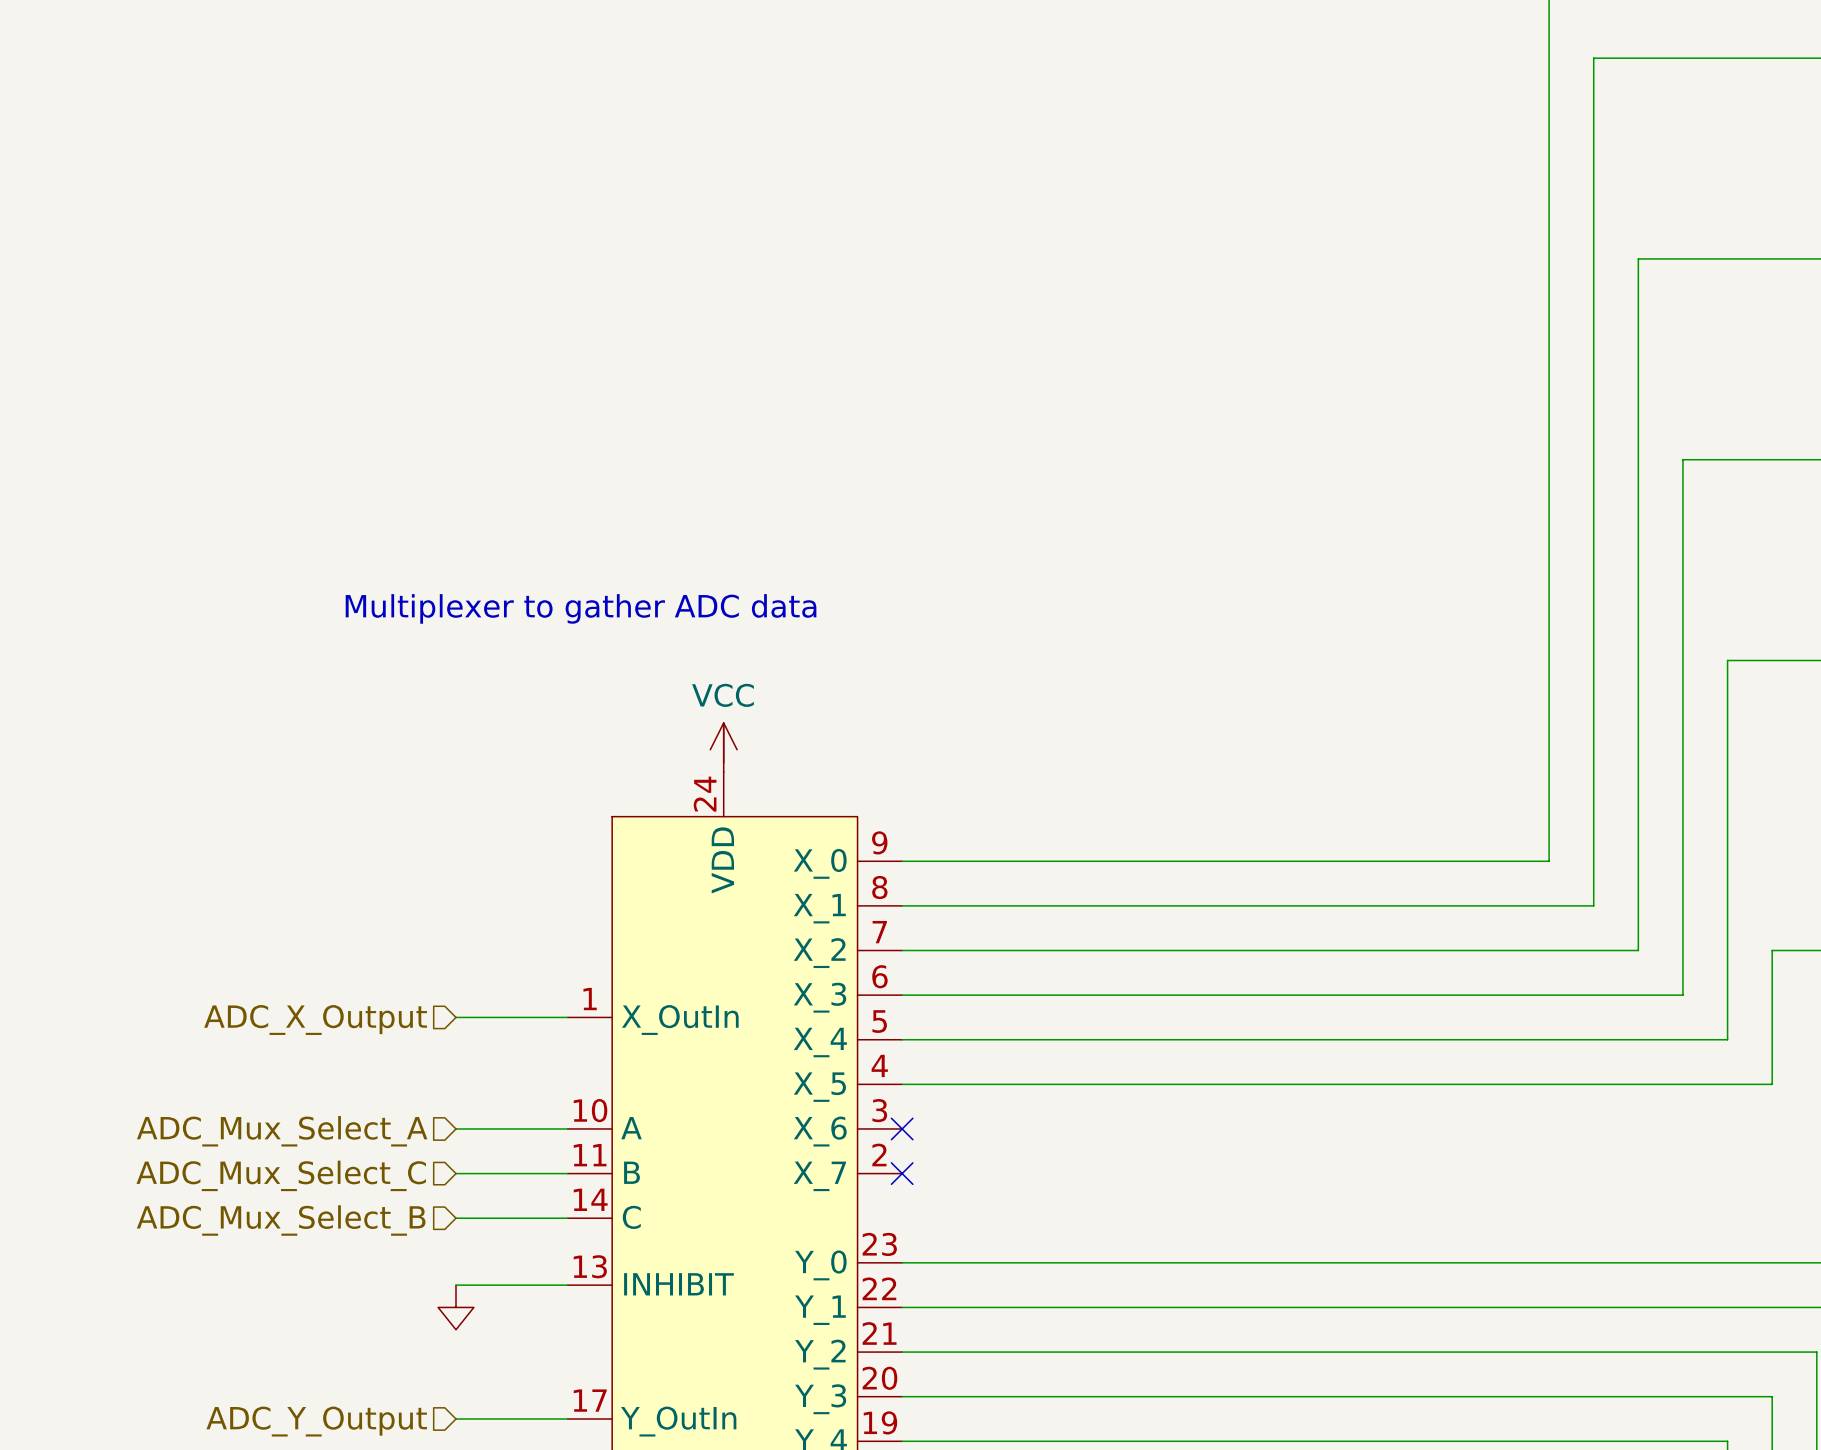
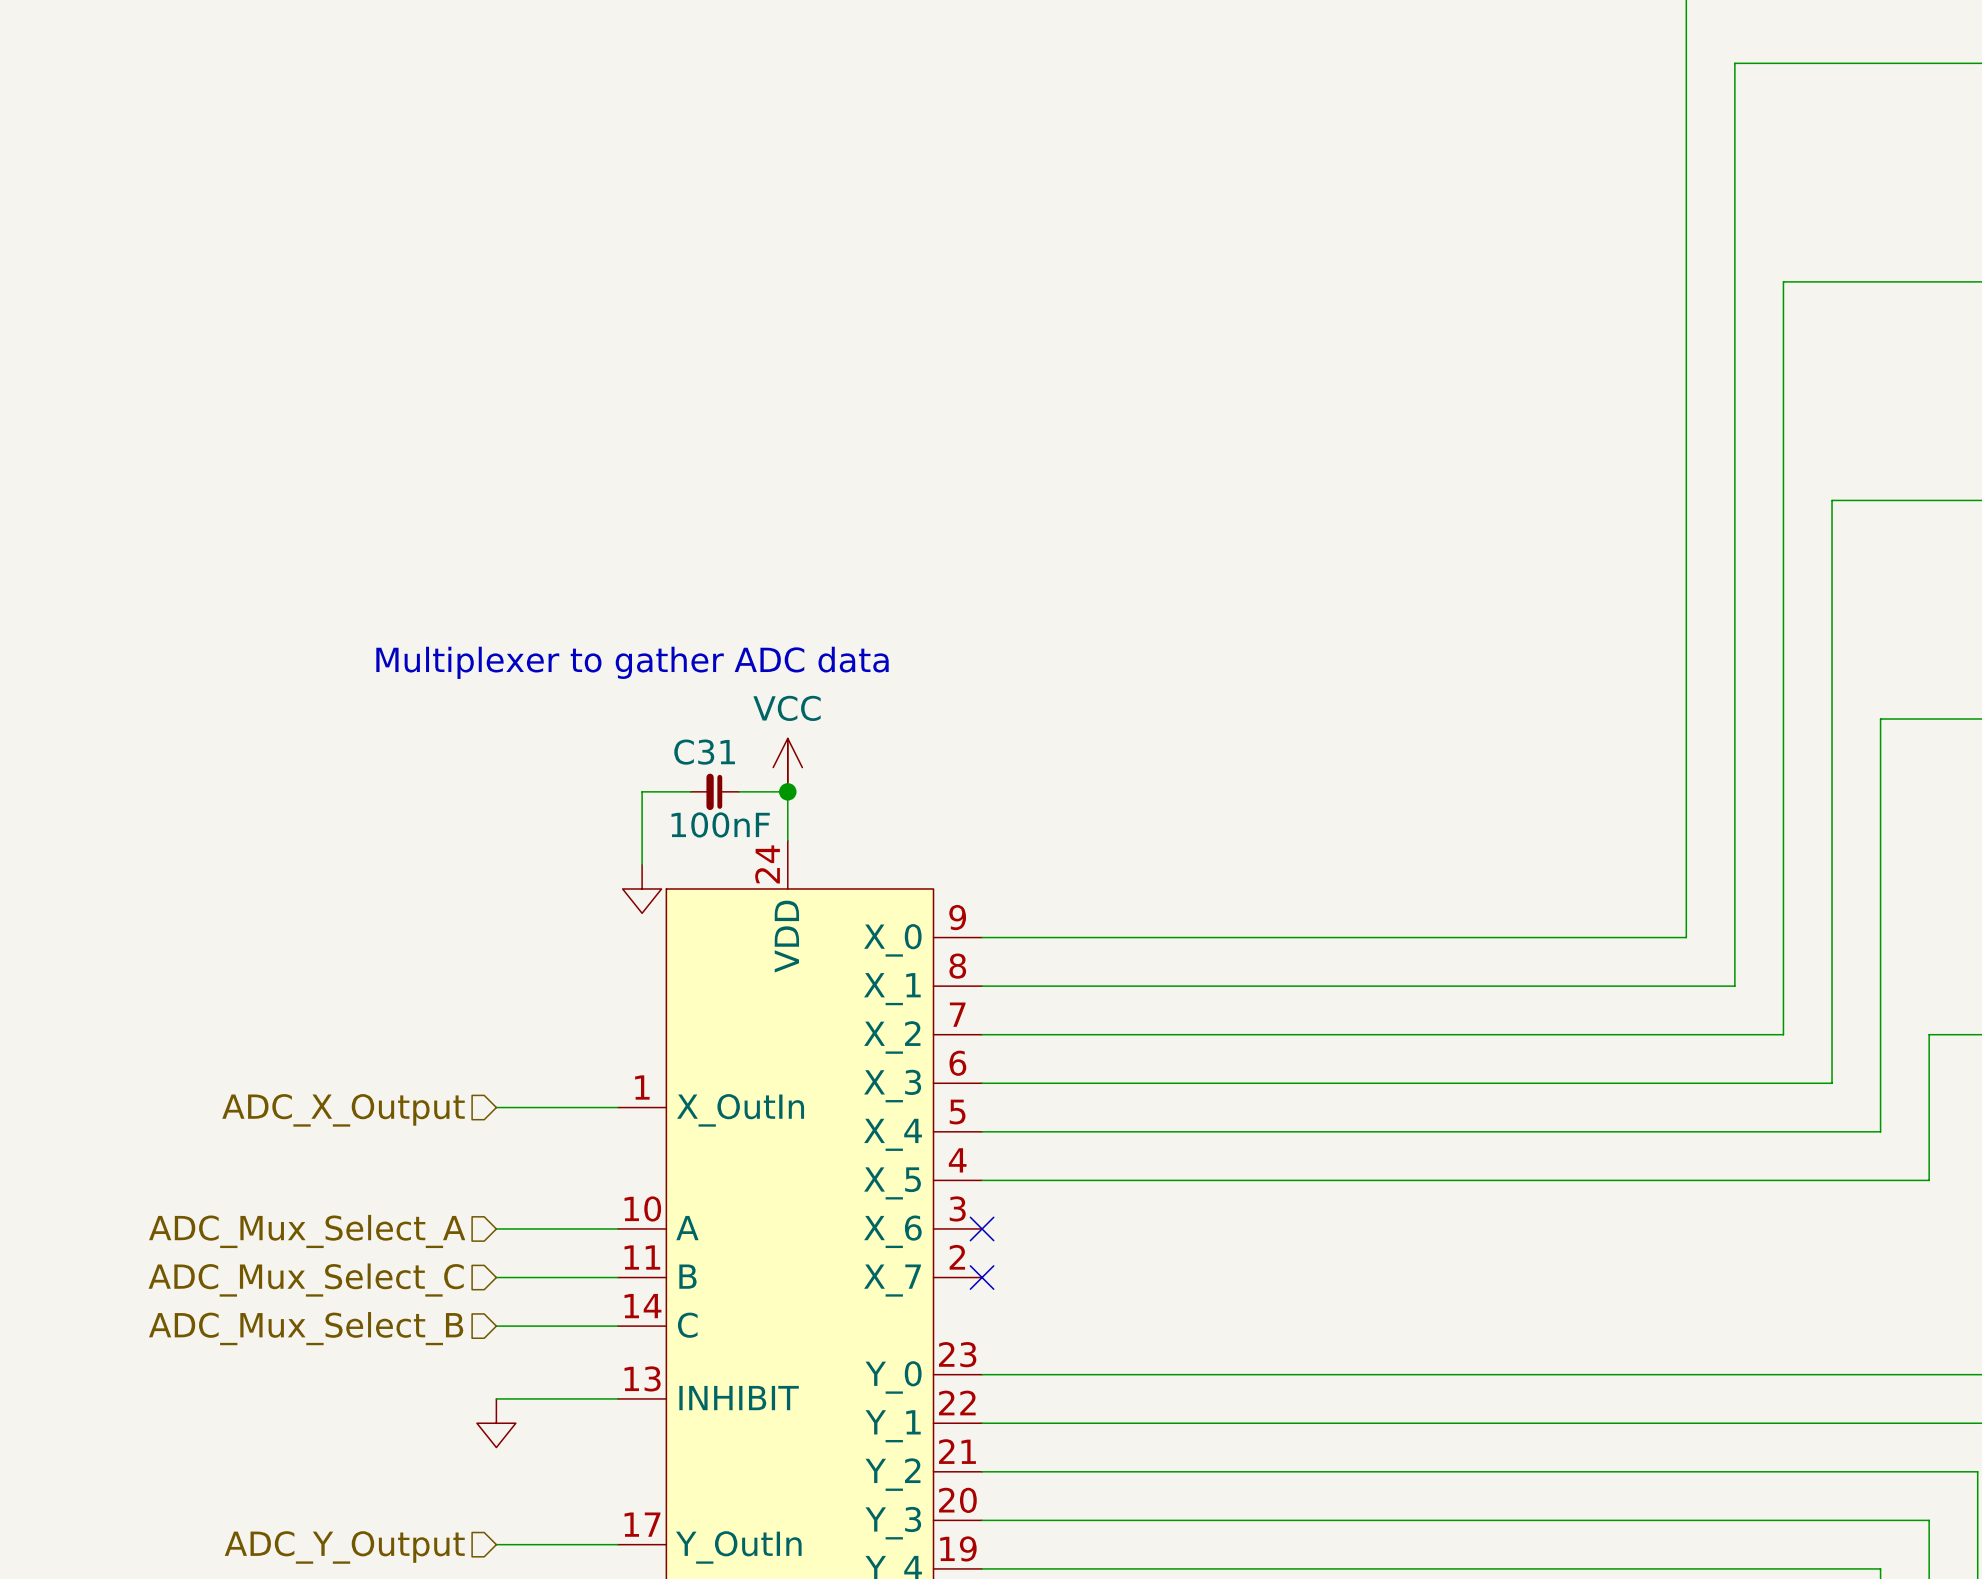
wire: none -> (690, 791) (642, 791) (642, 864)
C31: none -> 100nF (714, 791)
wire: none -> (739, 791) (787, 791) (787, 840)
junction: none -> (787, 791)
power symbol position: VCC (723, 747) -> VCC (787, 765)
power symbol: none -> (642, 888)

